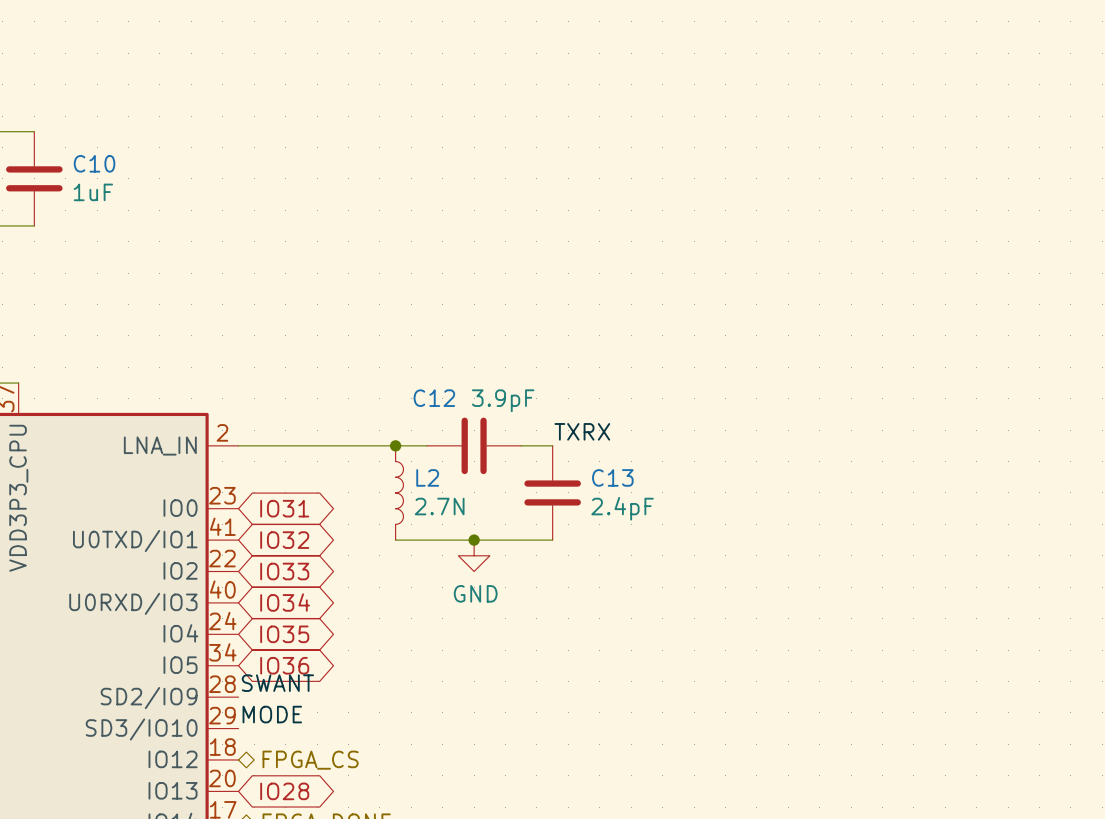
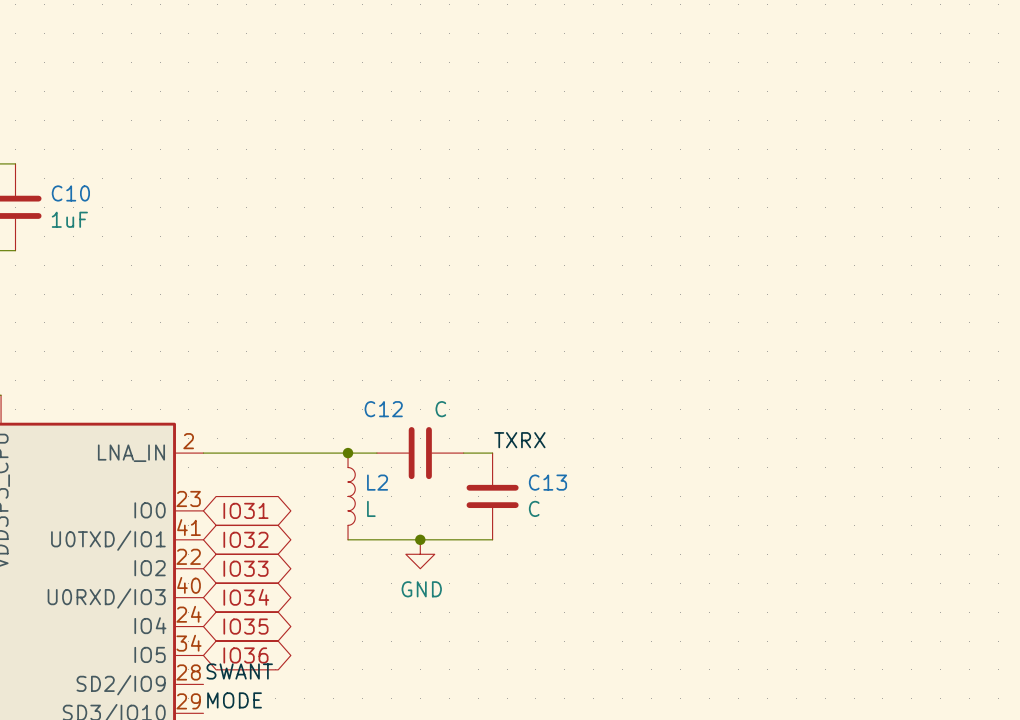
C12 value: 3.9pF (503, 400) -> C (440, 409)
L2 value: 2.7N (439, 506) -> L (371, 508)
C13 value: 2.4pF (622, 508) -> C (534, 508)

